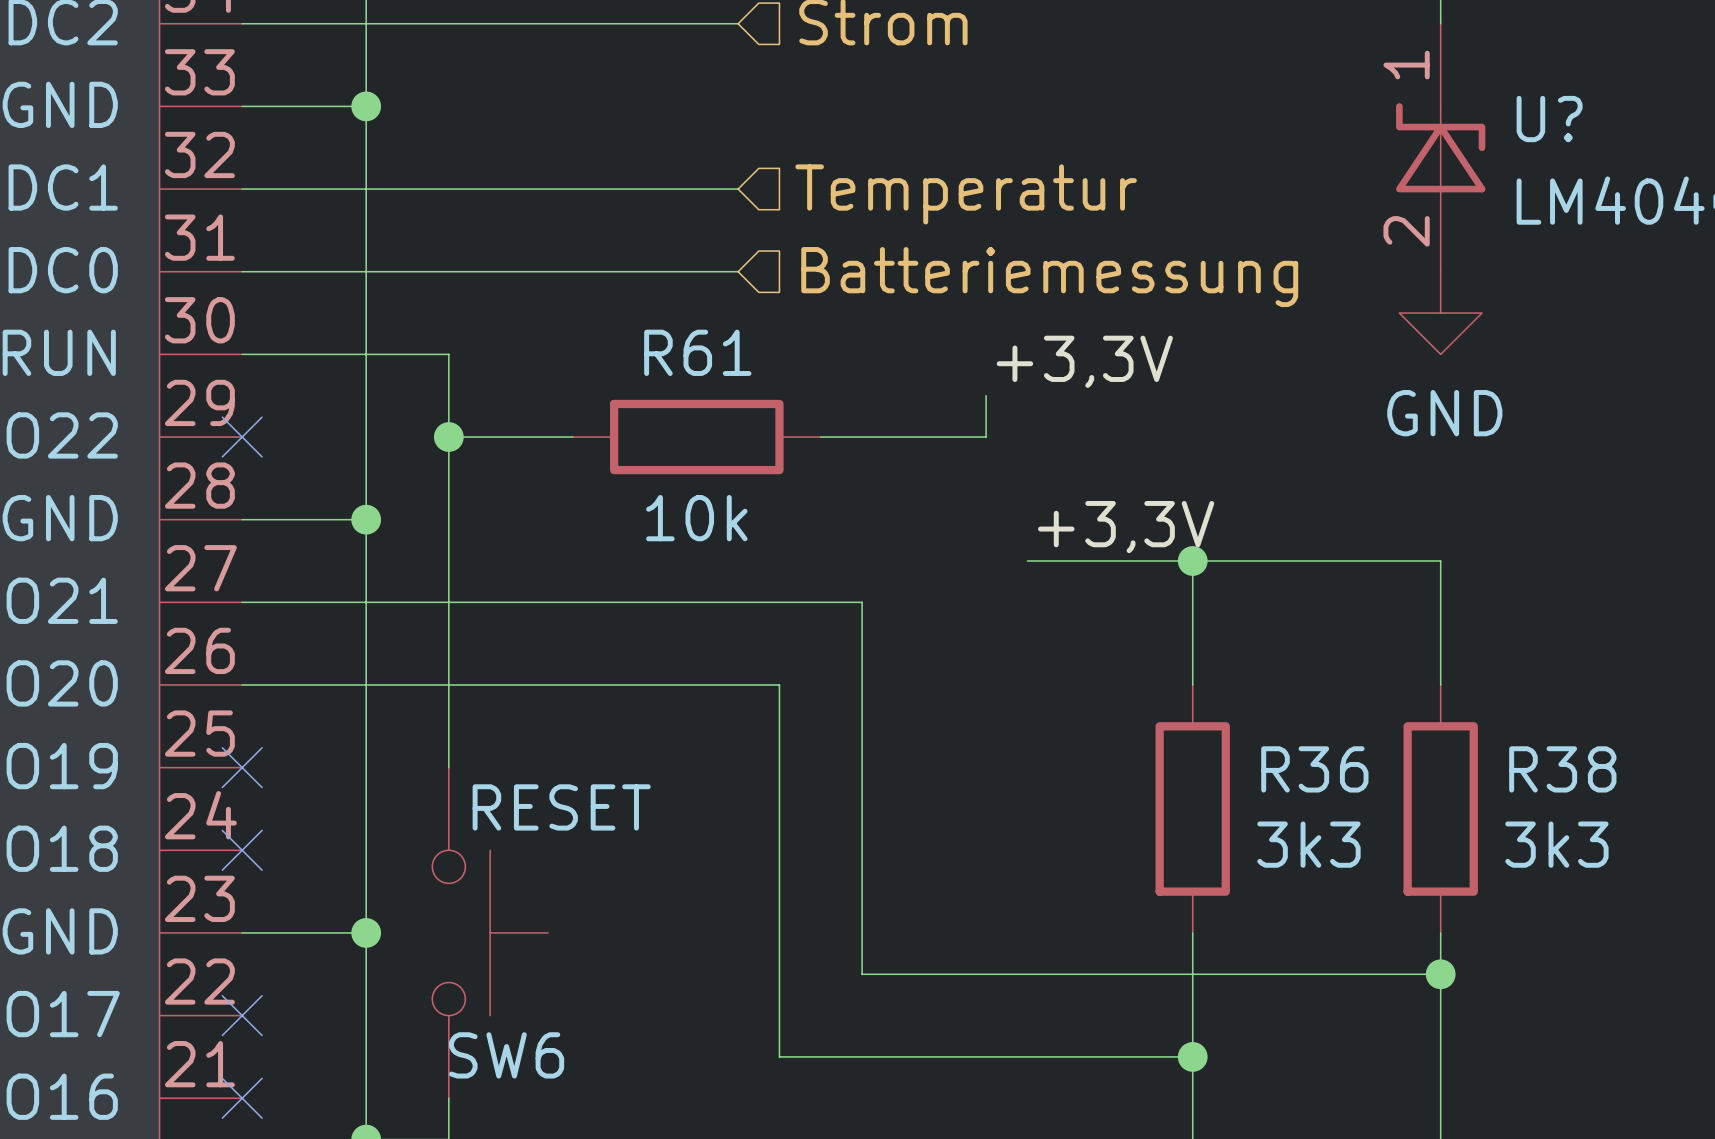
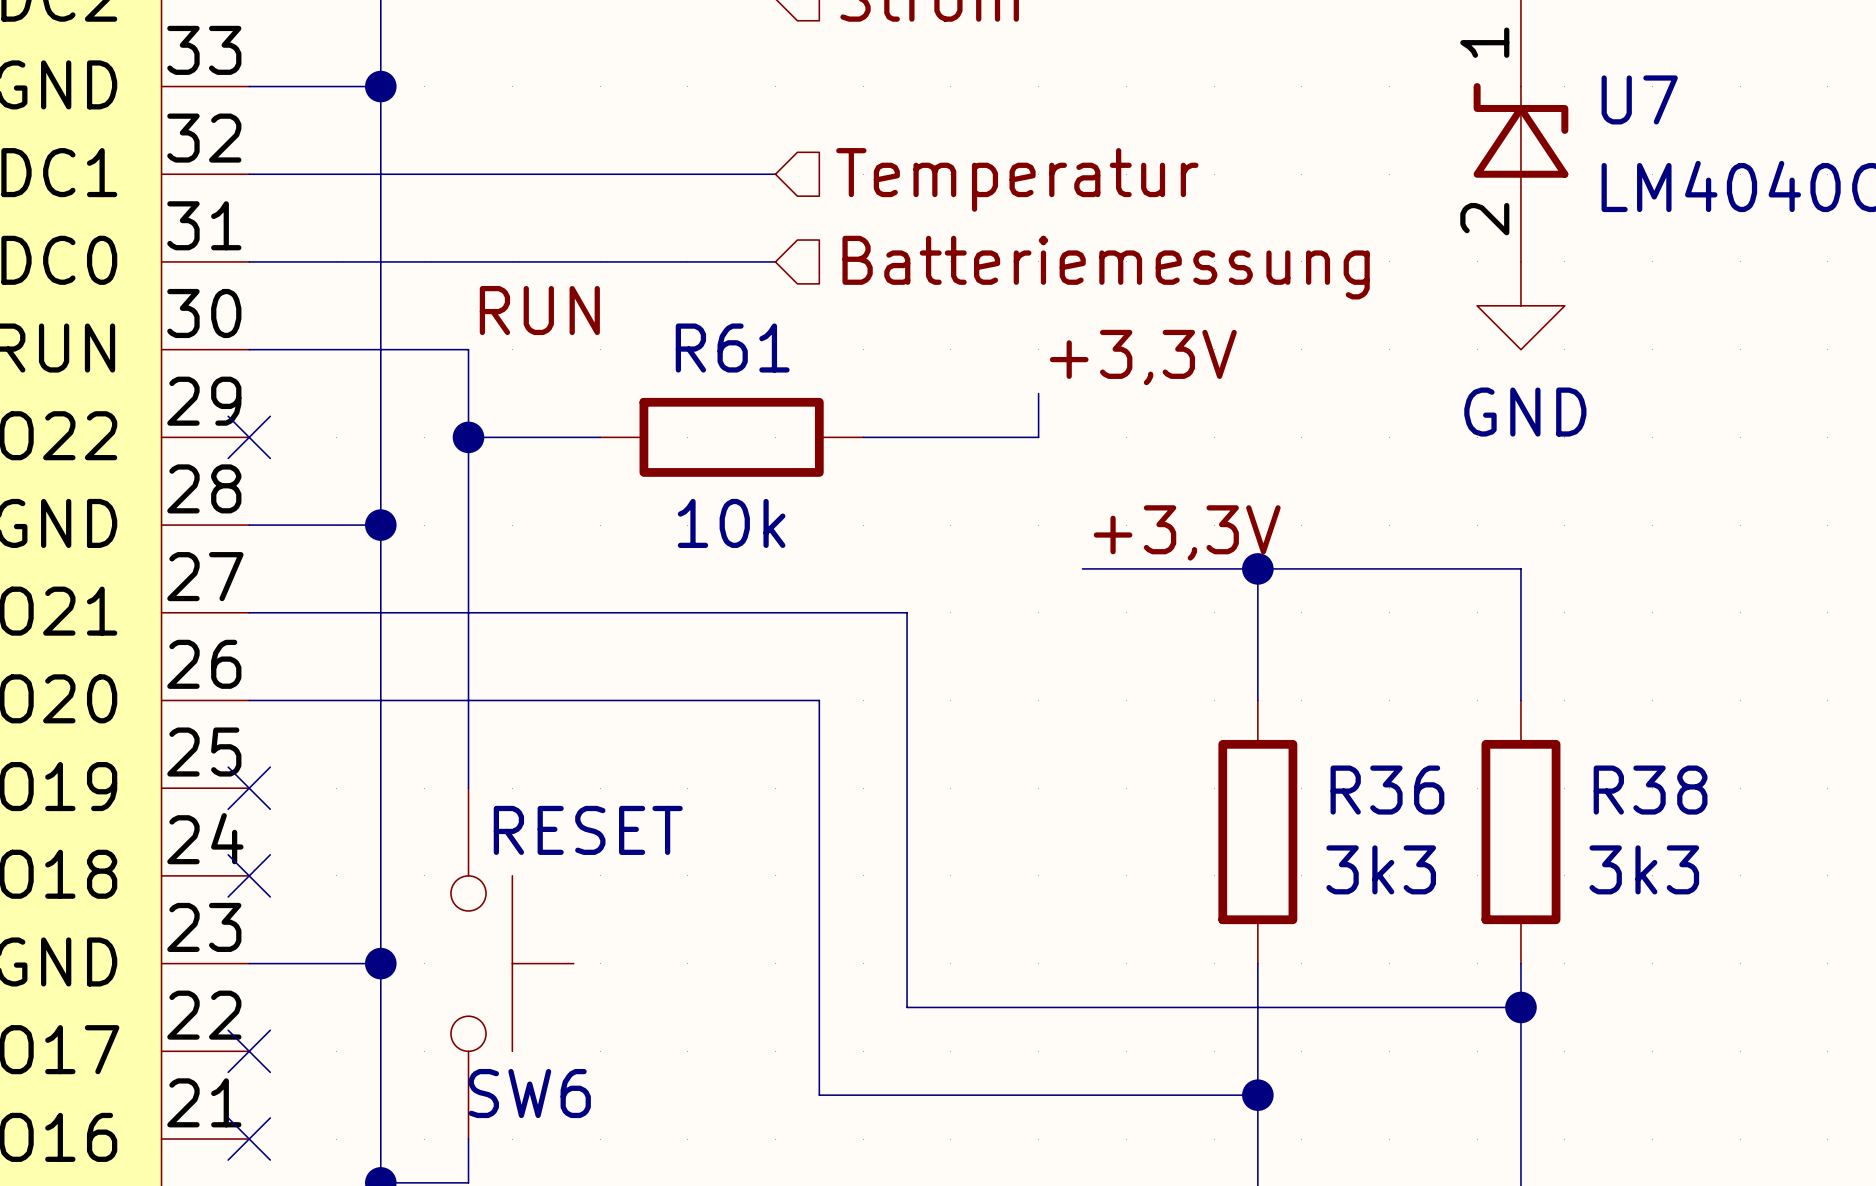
U? name: U? (1549, 119) -> U7 (1639, 99)
label: none -> RUN (539, 310)

